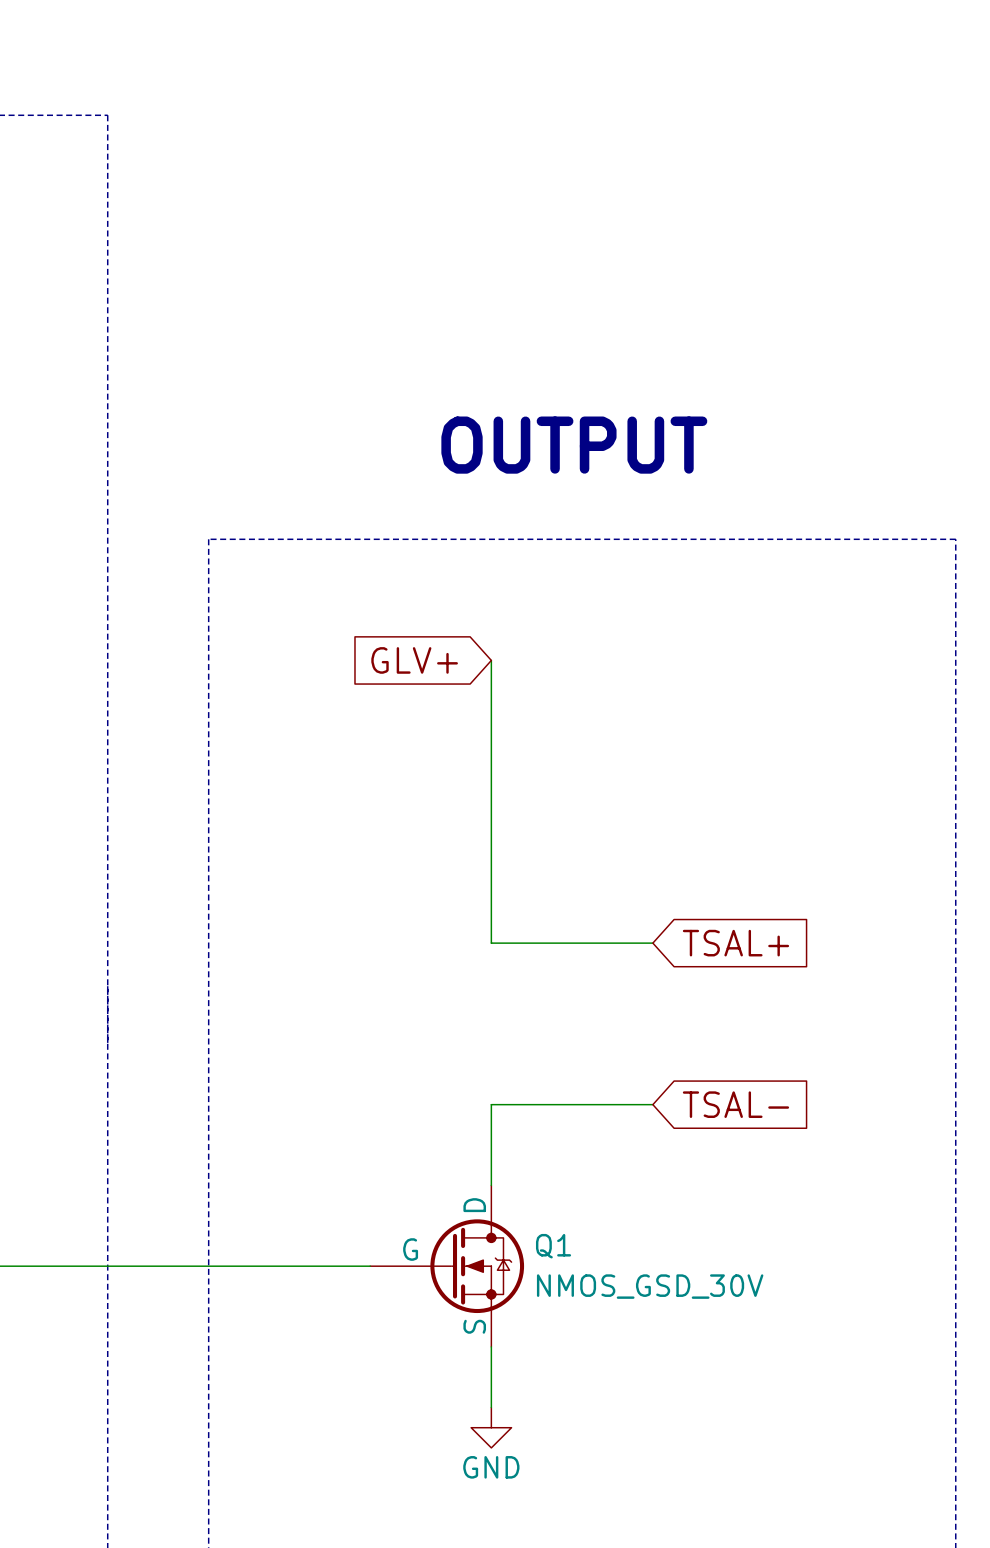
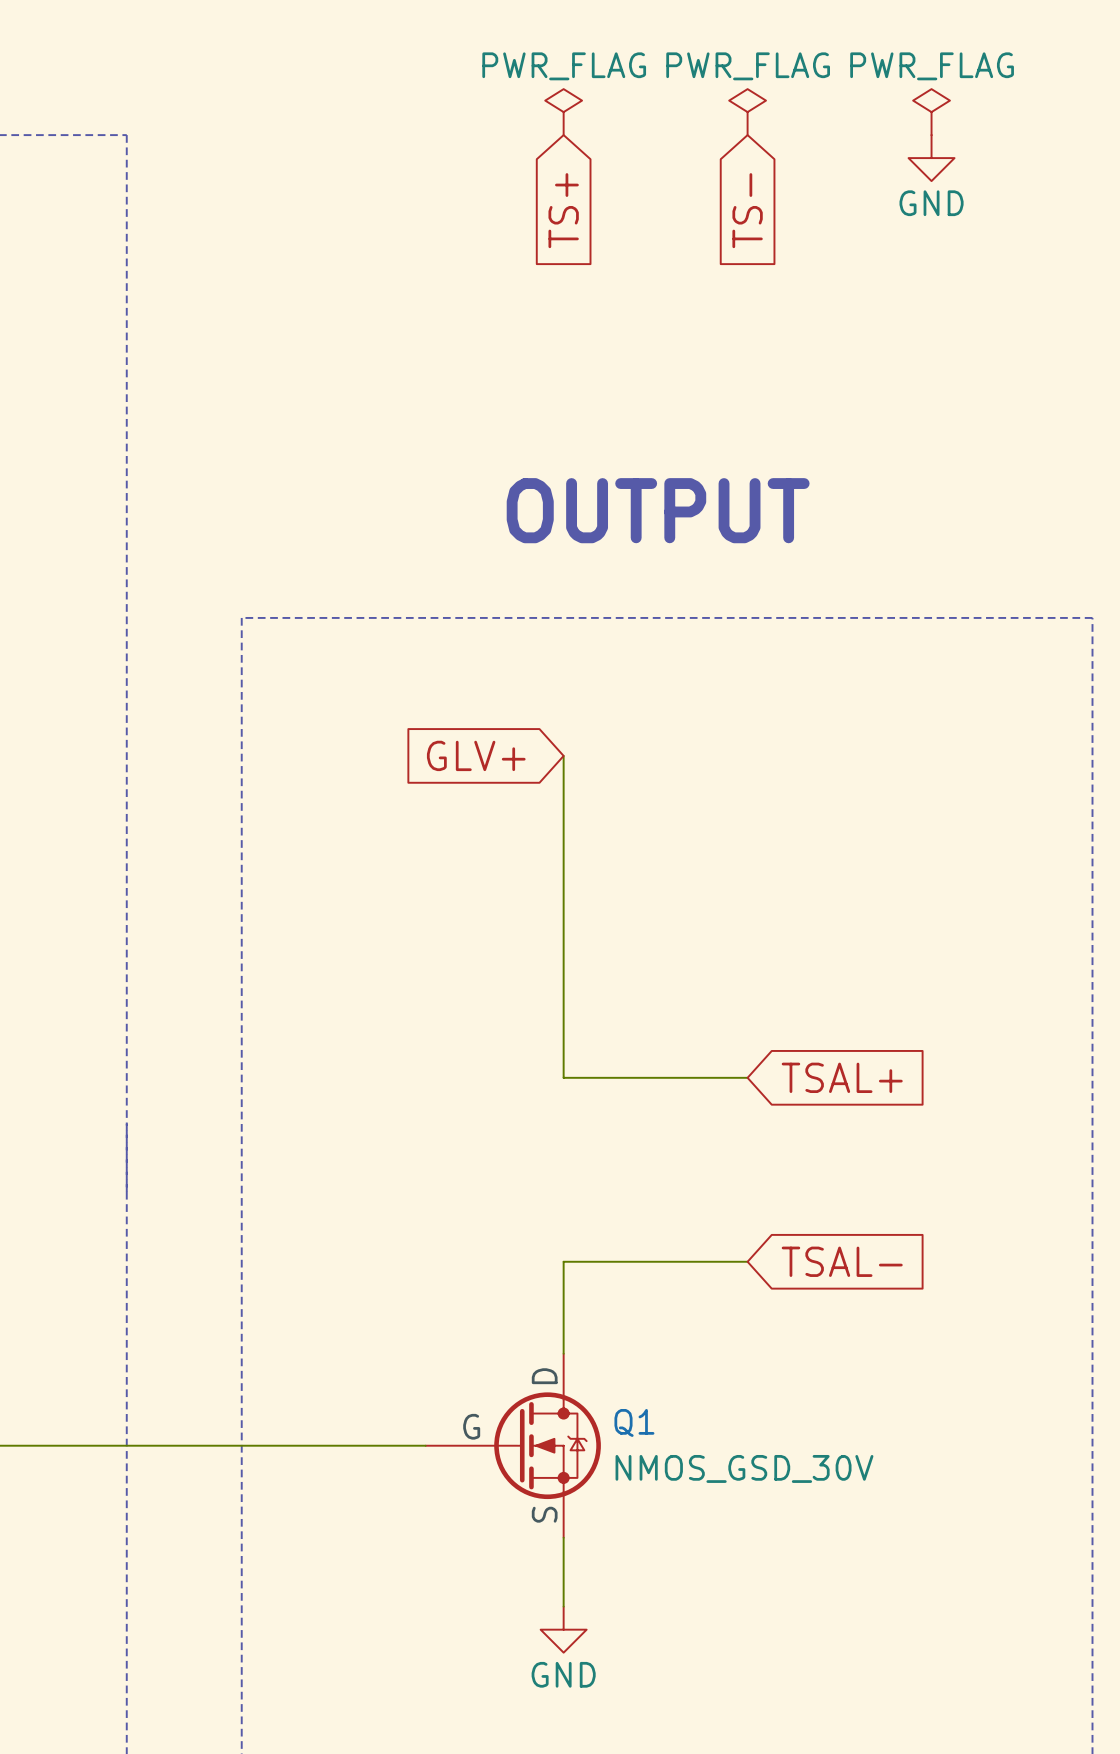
power symbol: none -> PWR_FLAG (563, 112)
power symbol: none -> PWR_FLAG (747, 112)
power symbol: none -> PWR_FLAG (931, 112)
power symbol: none -> GND (931, 158)
global label: none -> TS+ (563, 210)
global label: none -> TS- (747, 210)

